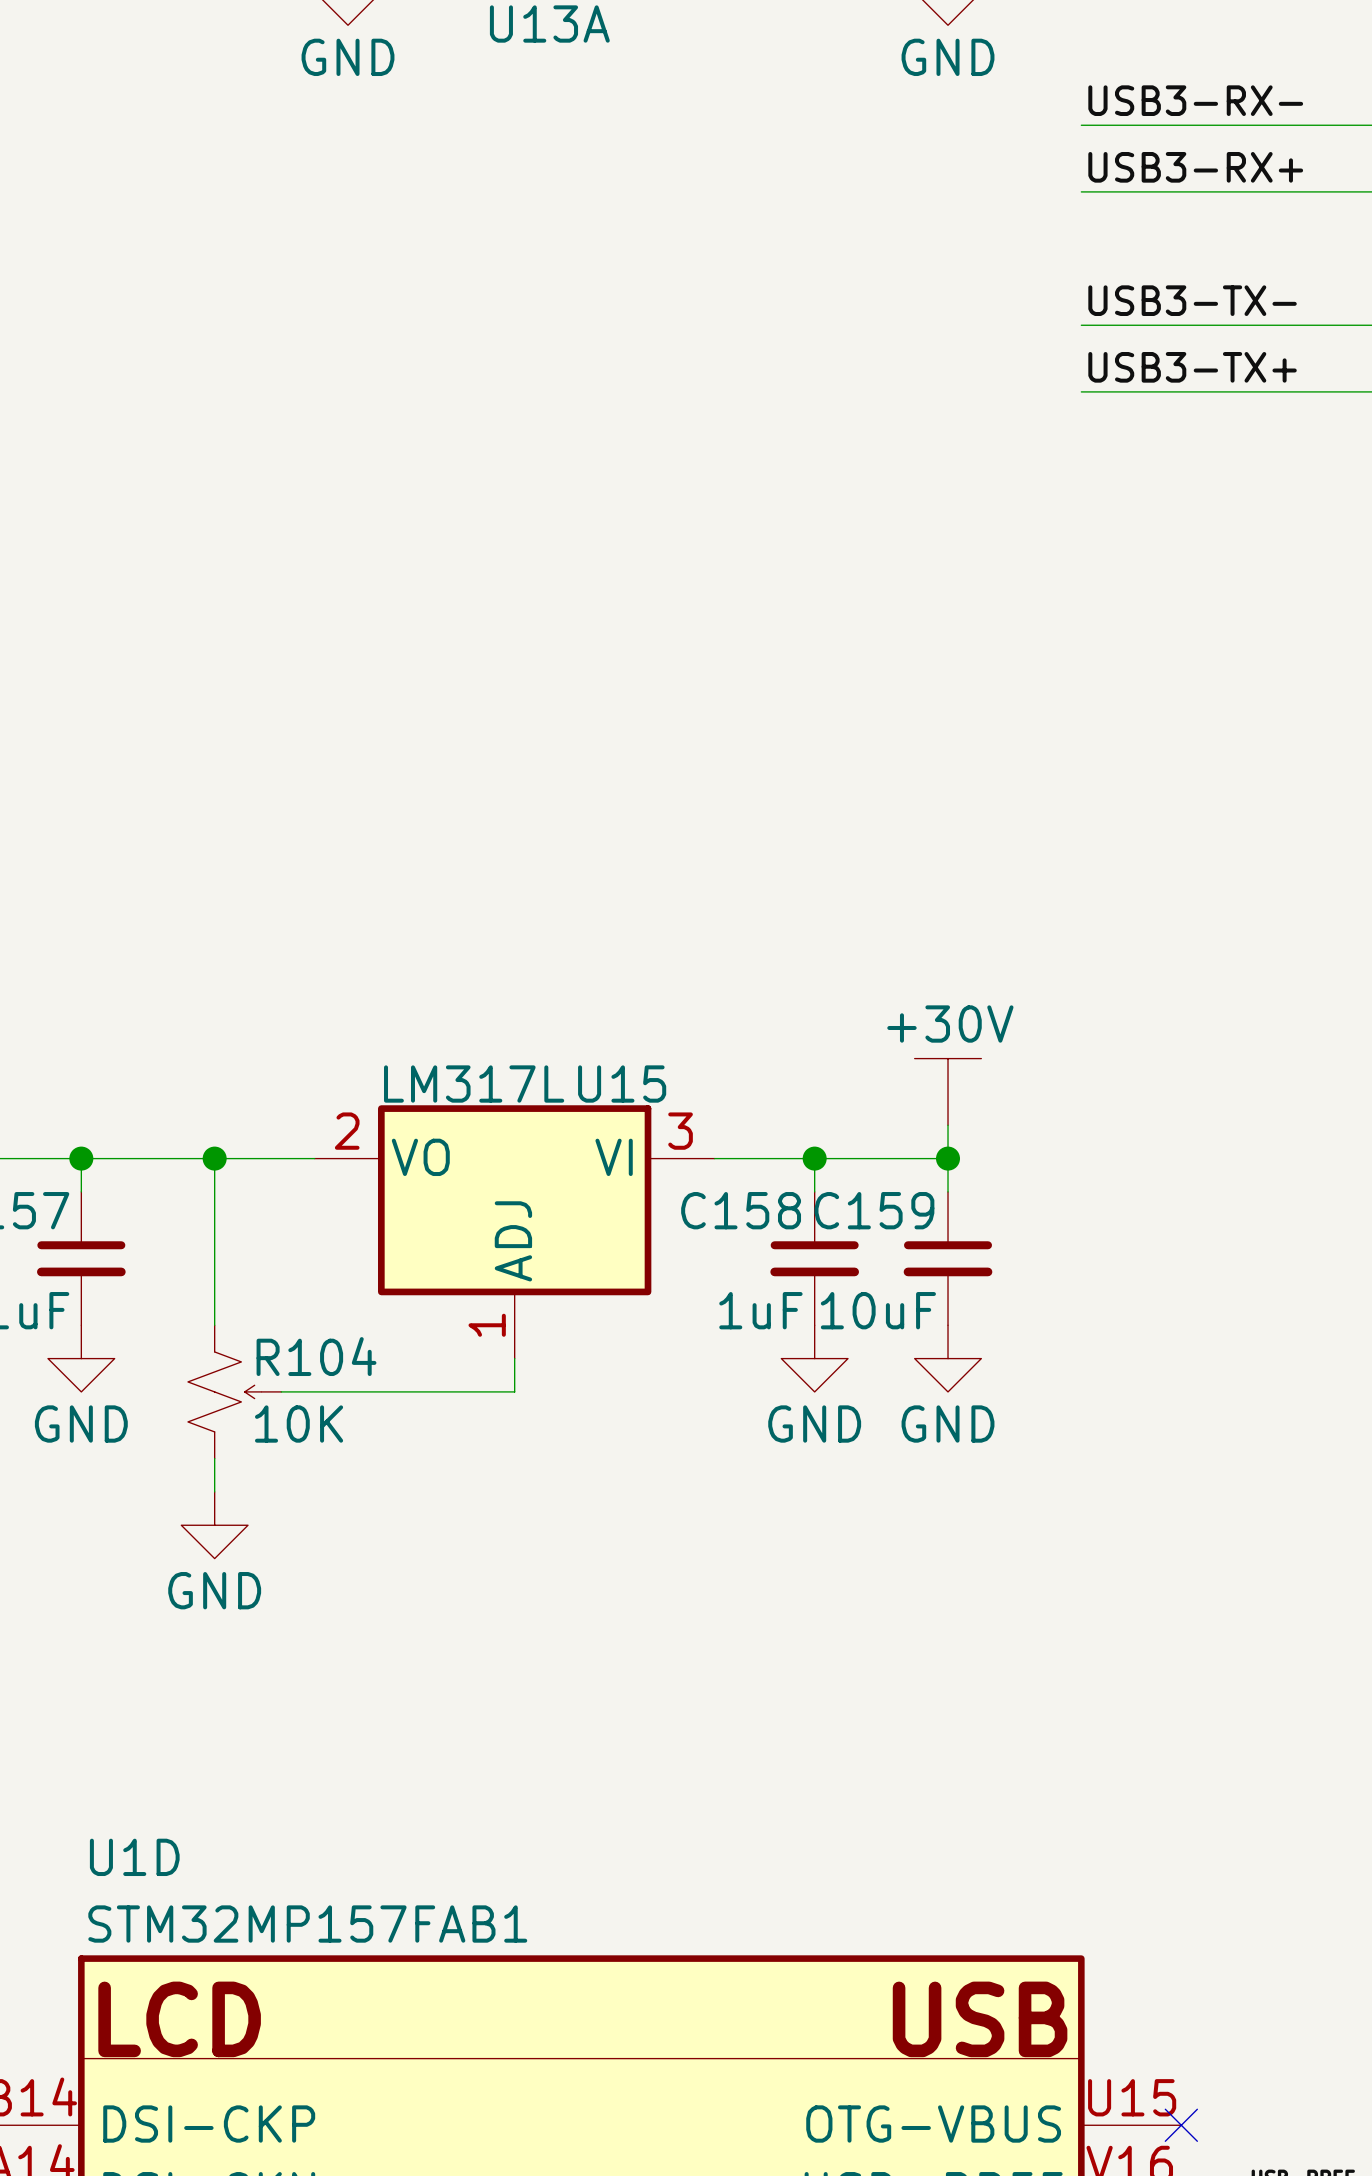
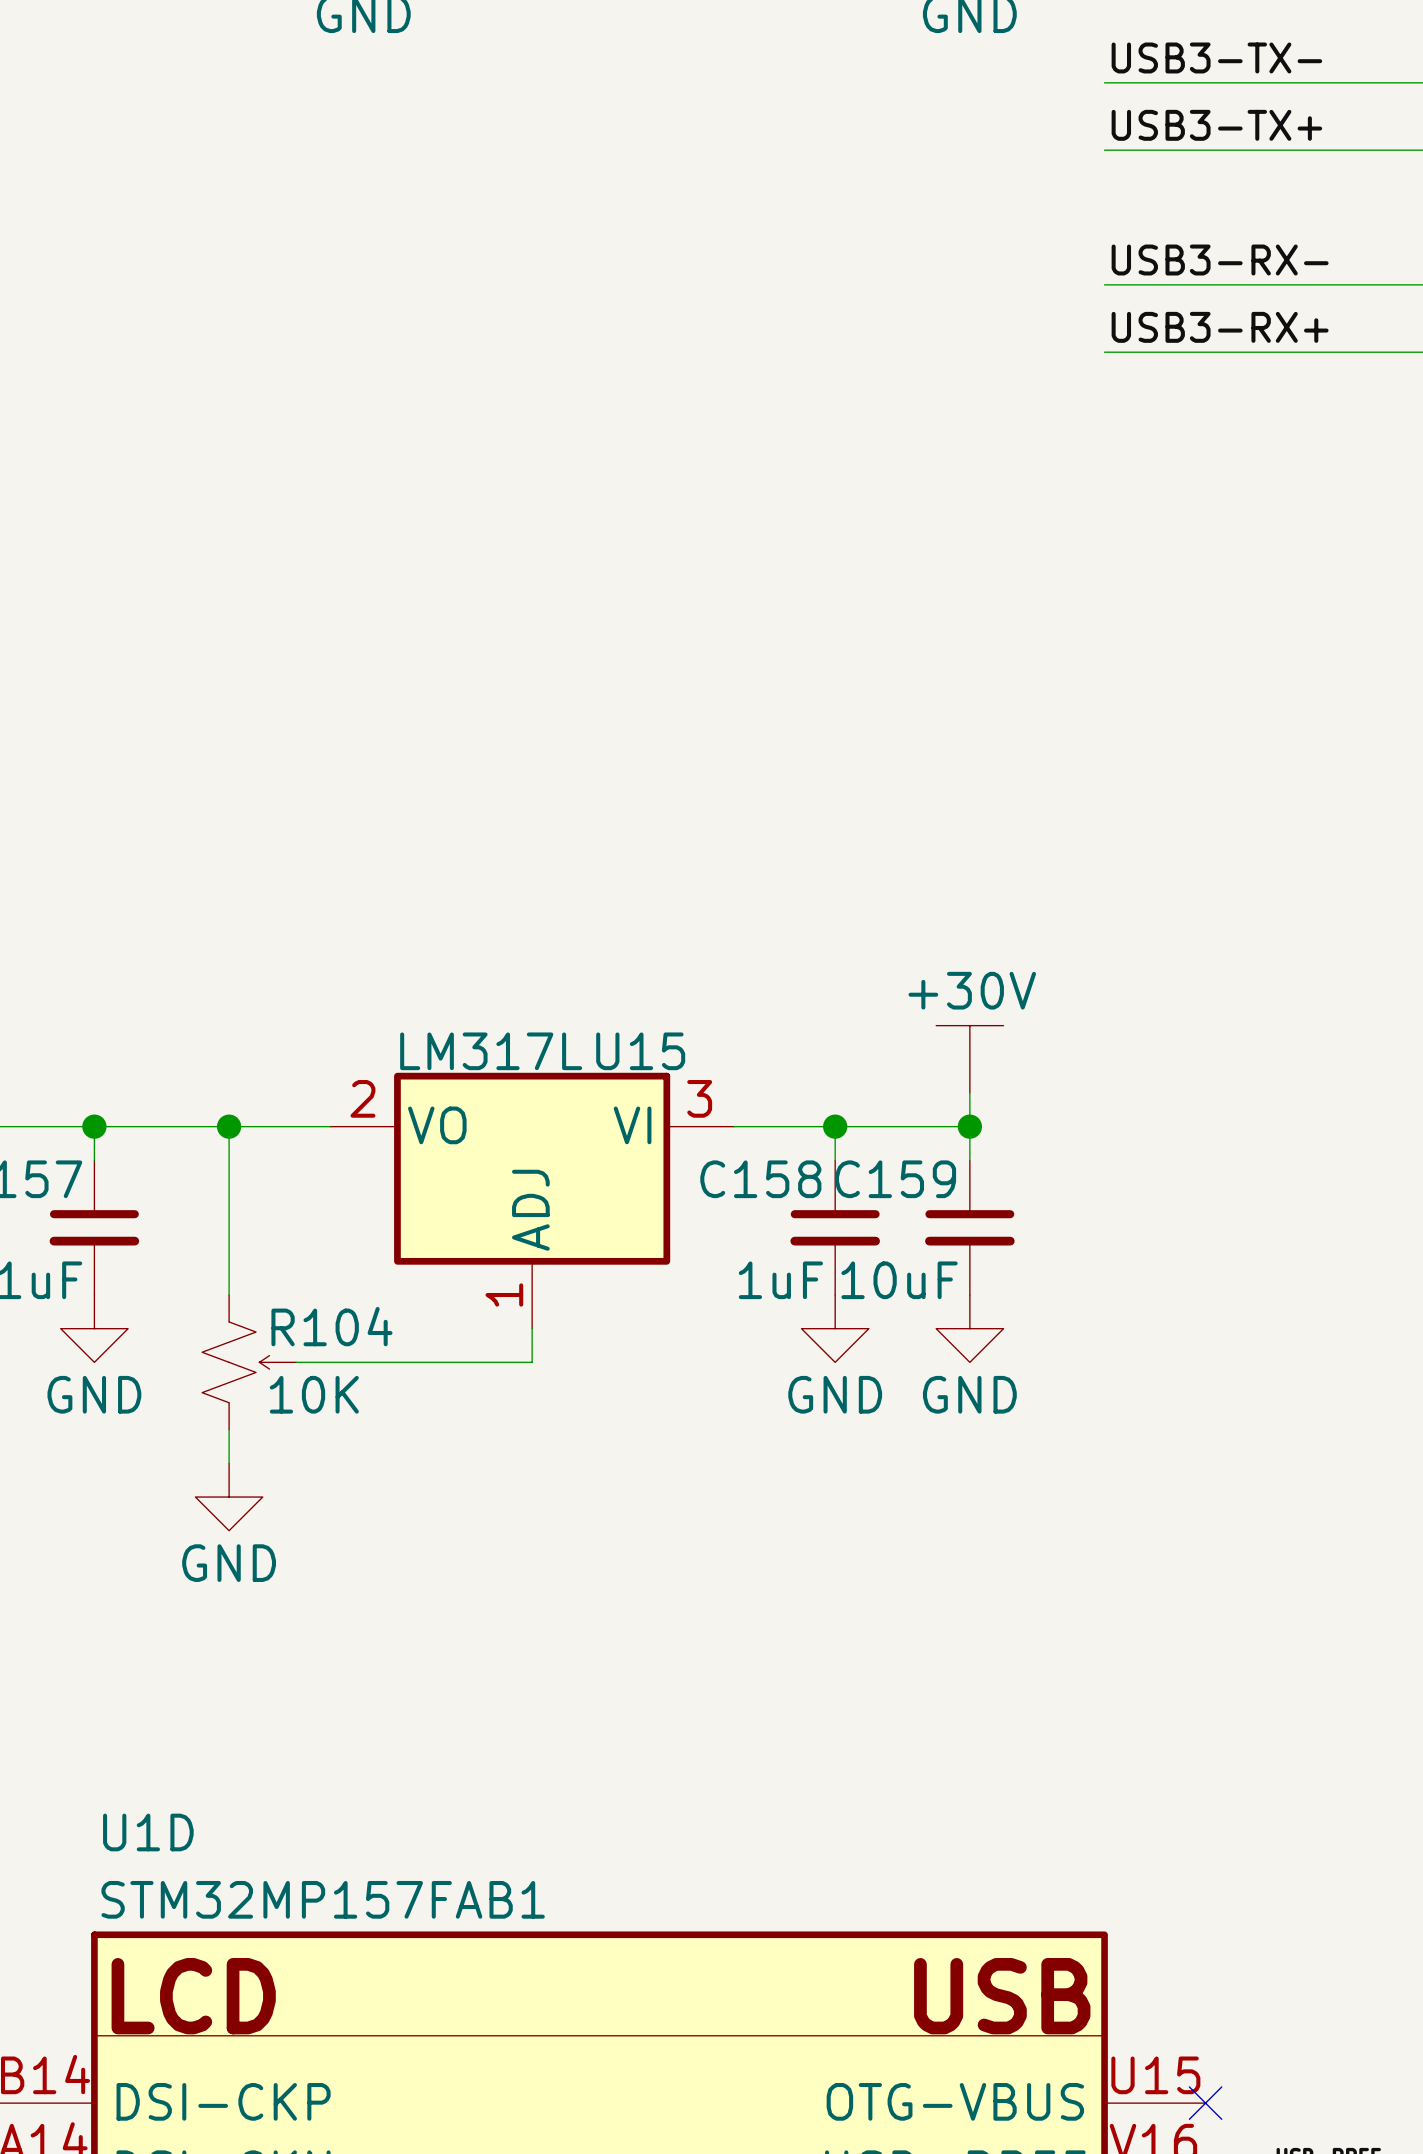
label: USB3-RX- (1195, 100) -> USB3-TX- (1216, 57)
label: USB3-RX+ (1195, 167) -> USB3-TX+ (1216, 125)
label: USB3-TX- (1192, 300) -> USB3-RX- (1220, 260)
label: USB3-TX+ (1192, 367) -> USB3-RX+ (1220, 327)

